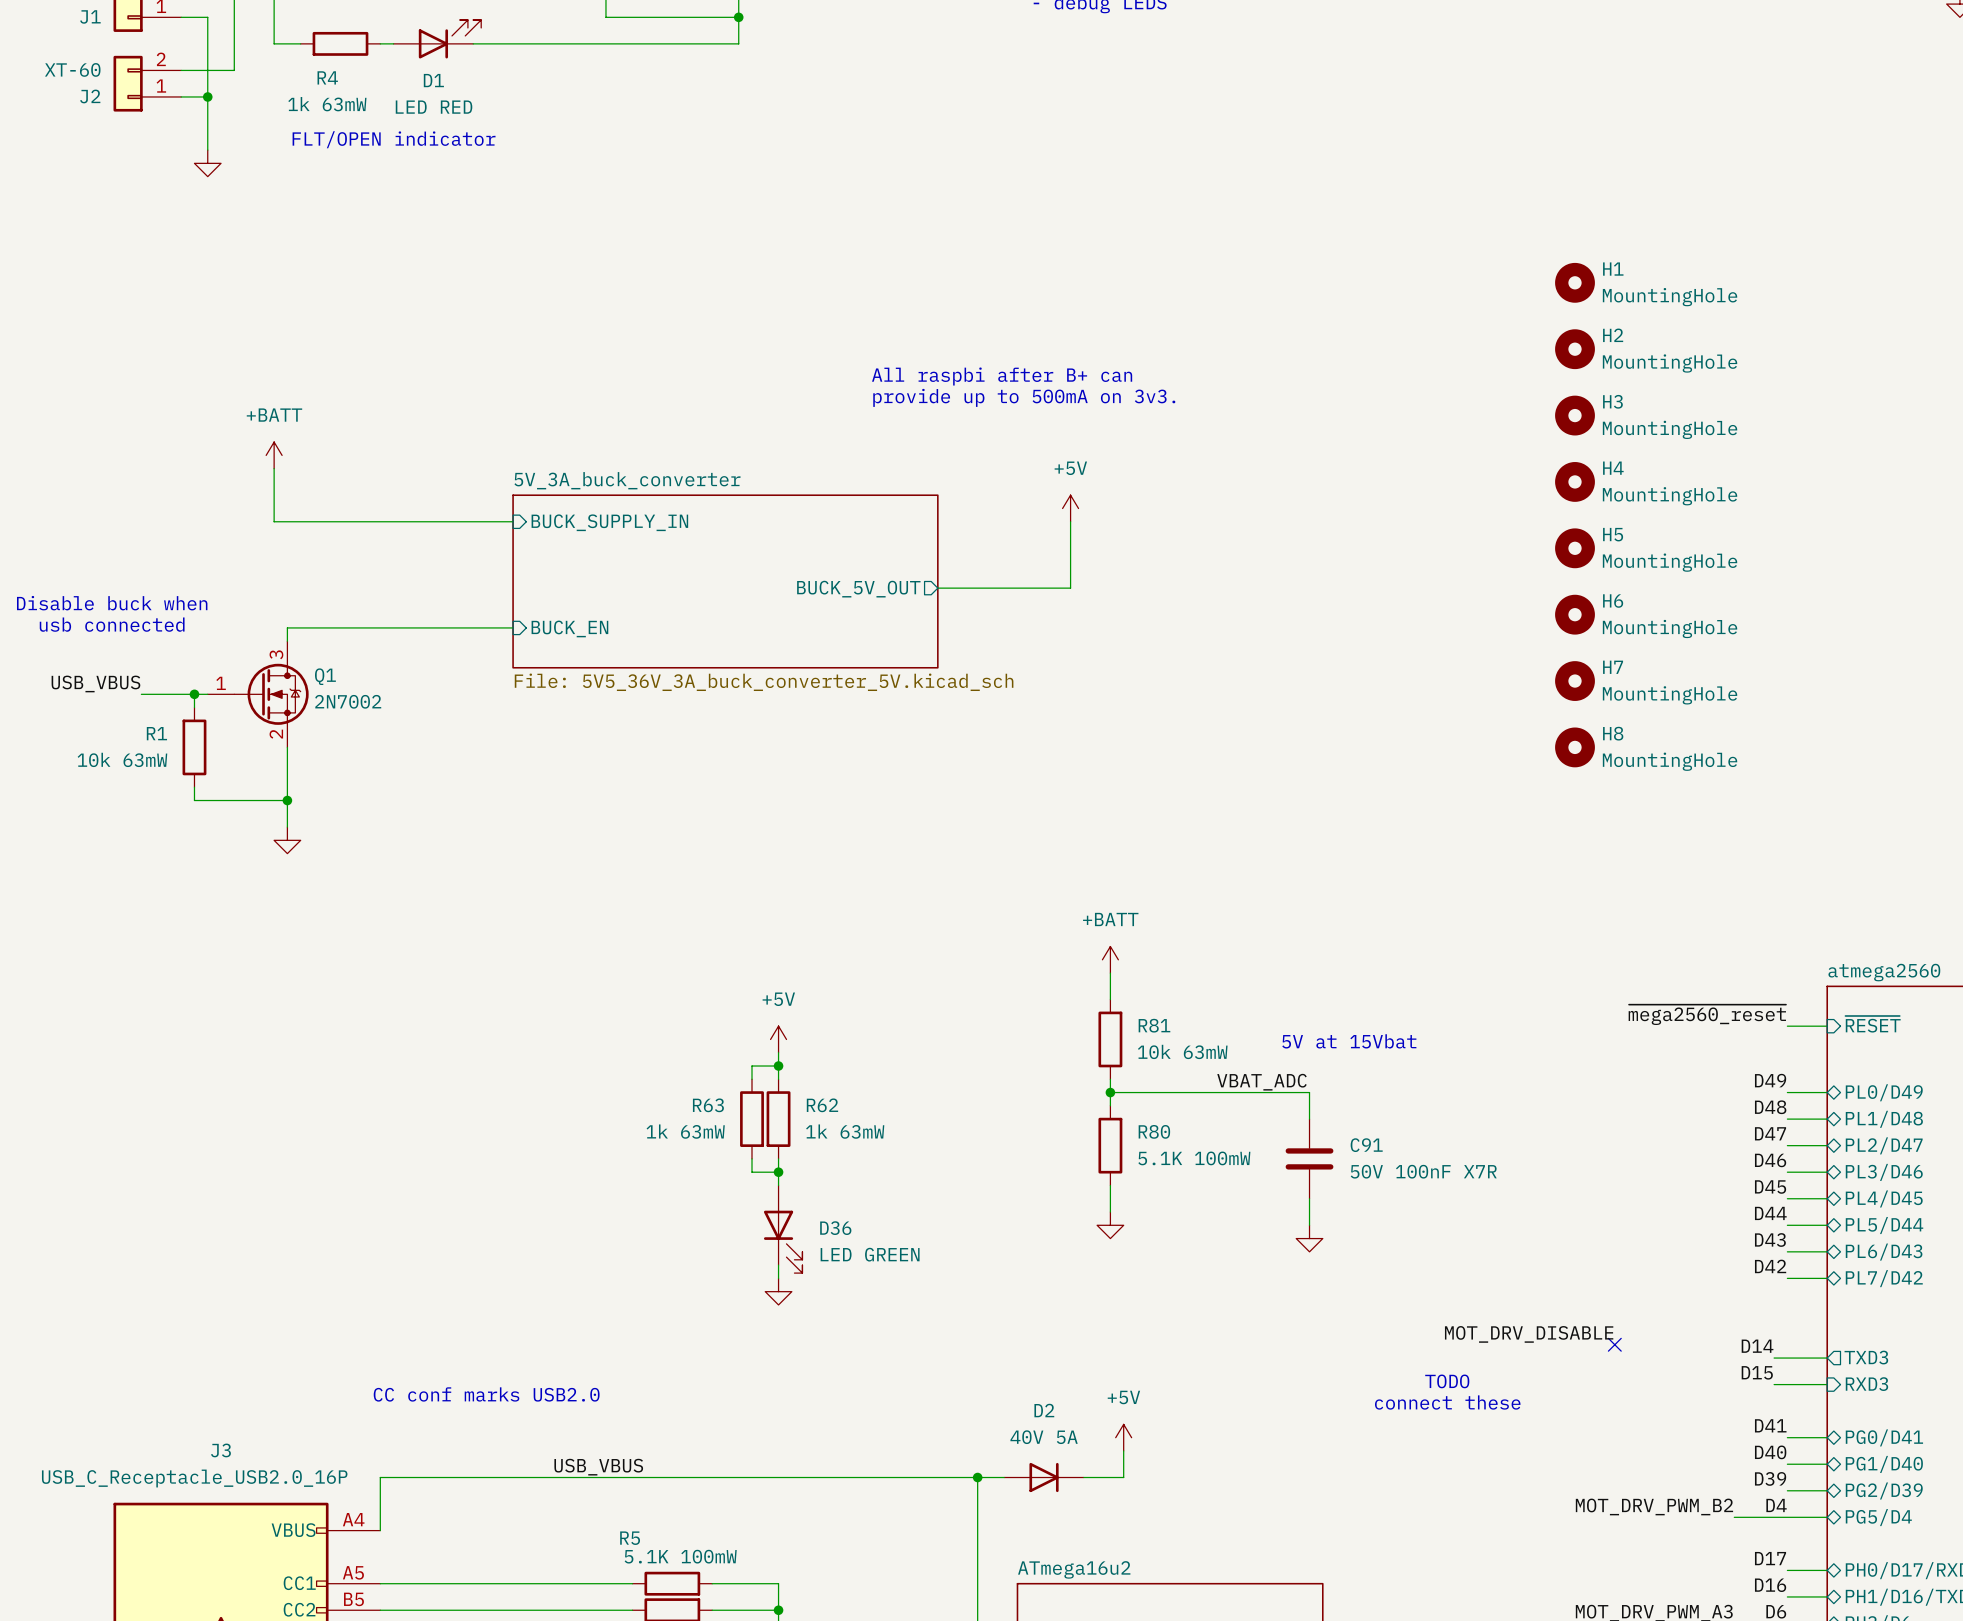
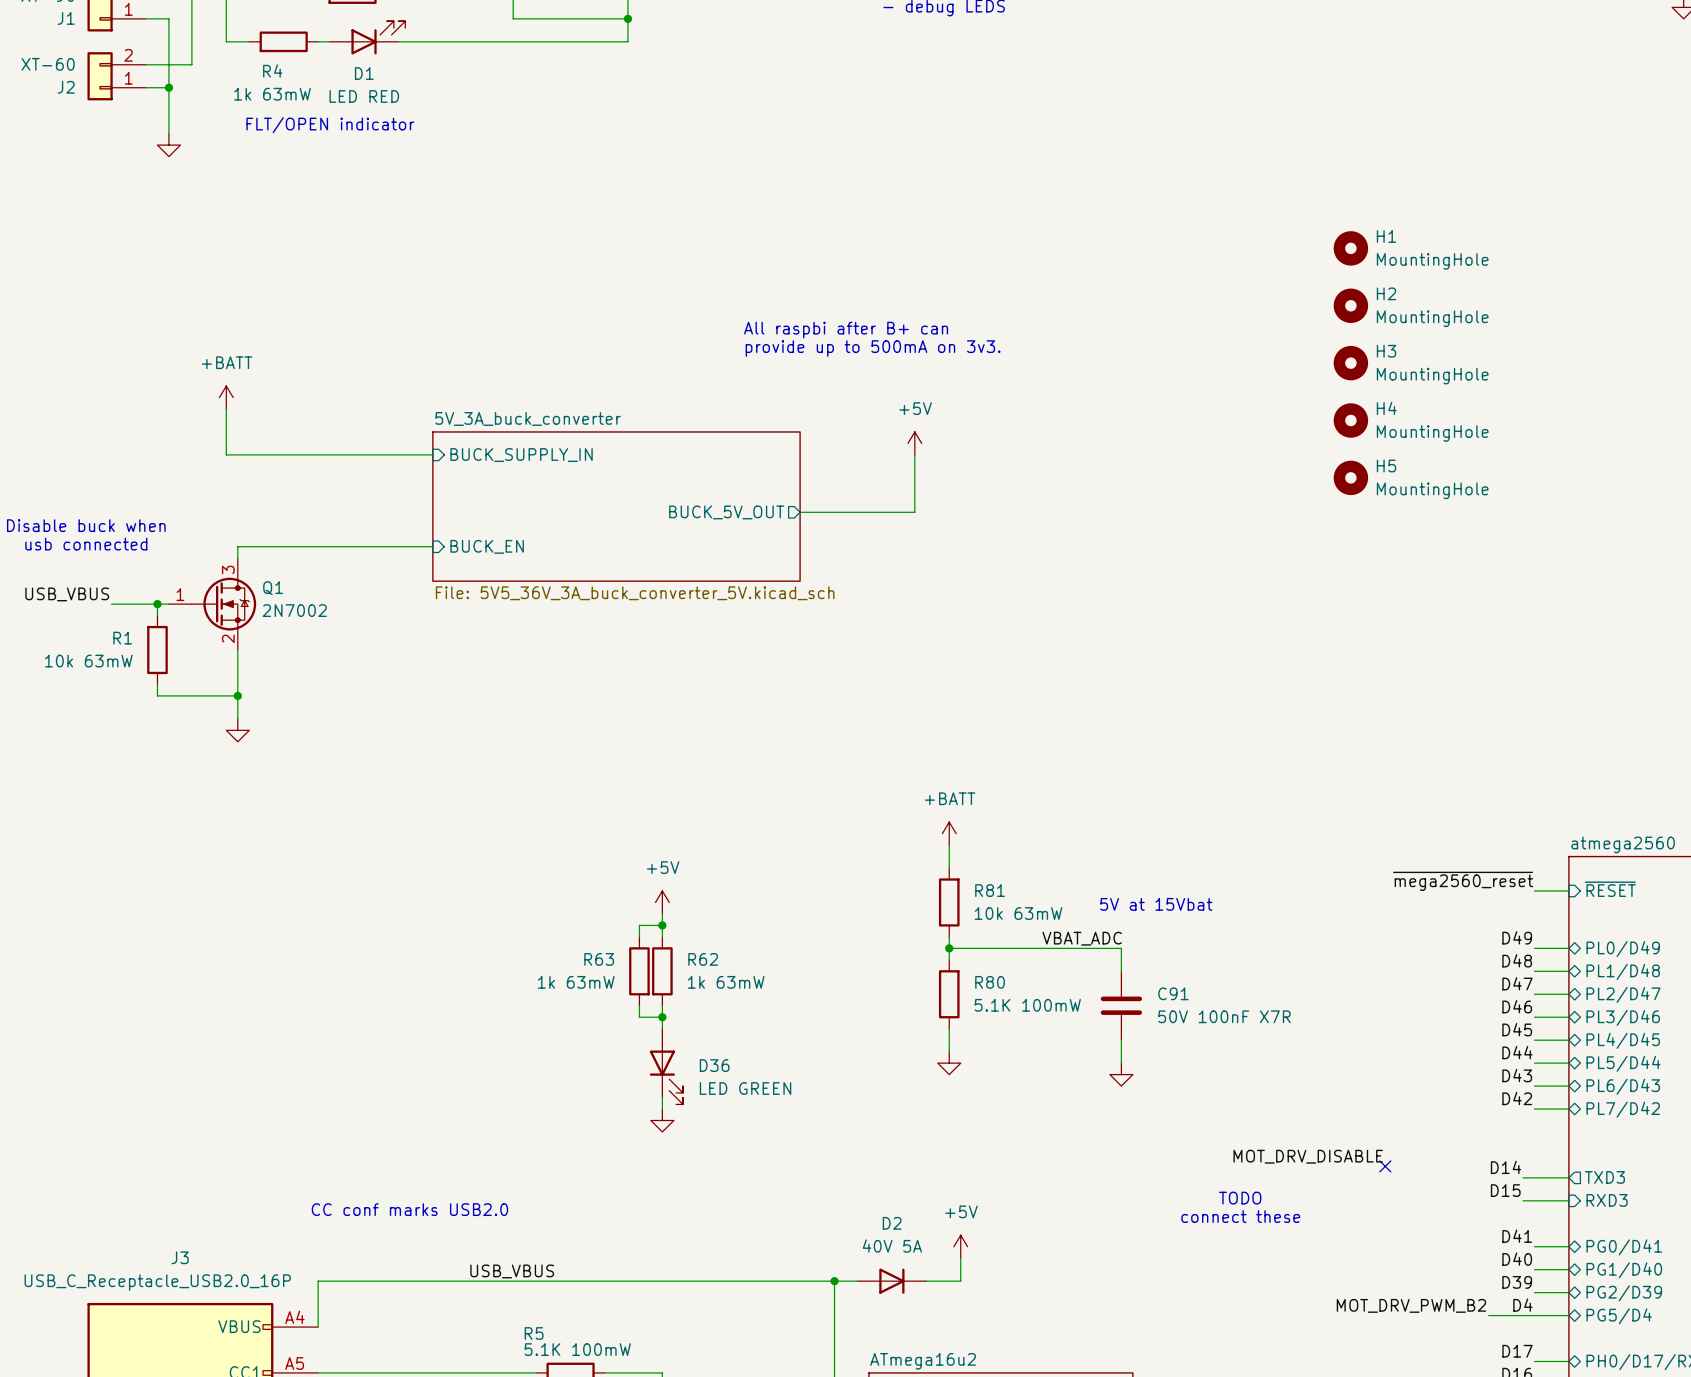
H6: MountingHole (1575, 614) -> none
H7: MountingHole (1575, 681) -> none
H8: MountingHole (1575, 747) -> none

